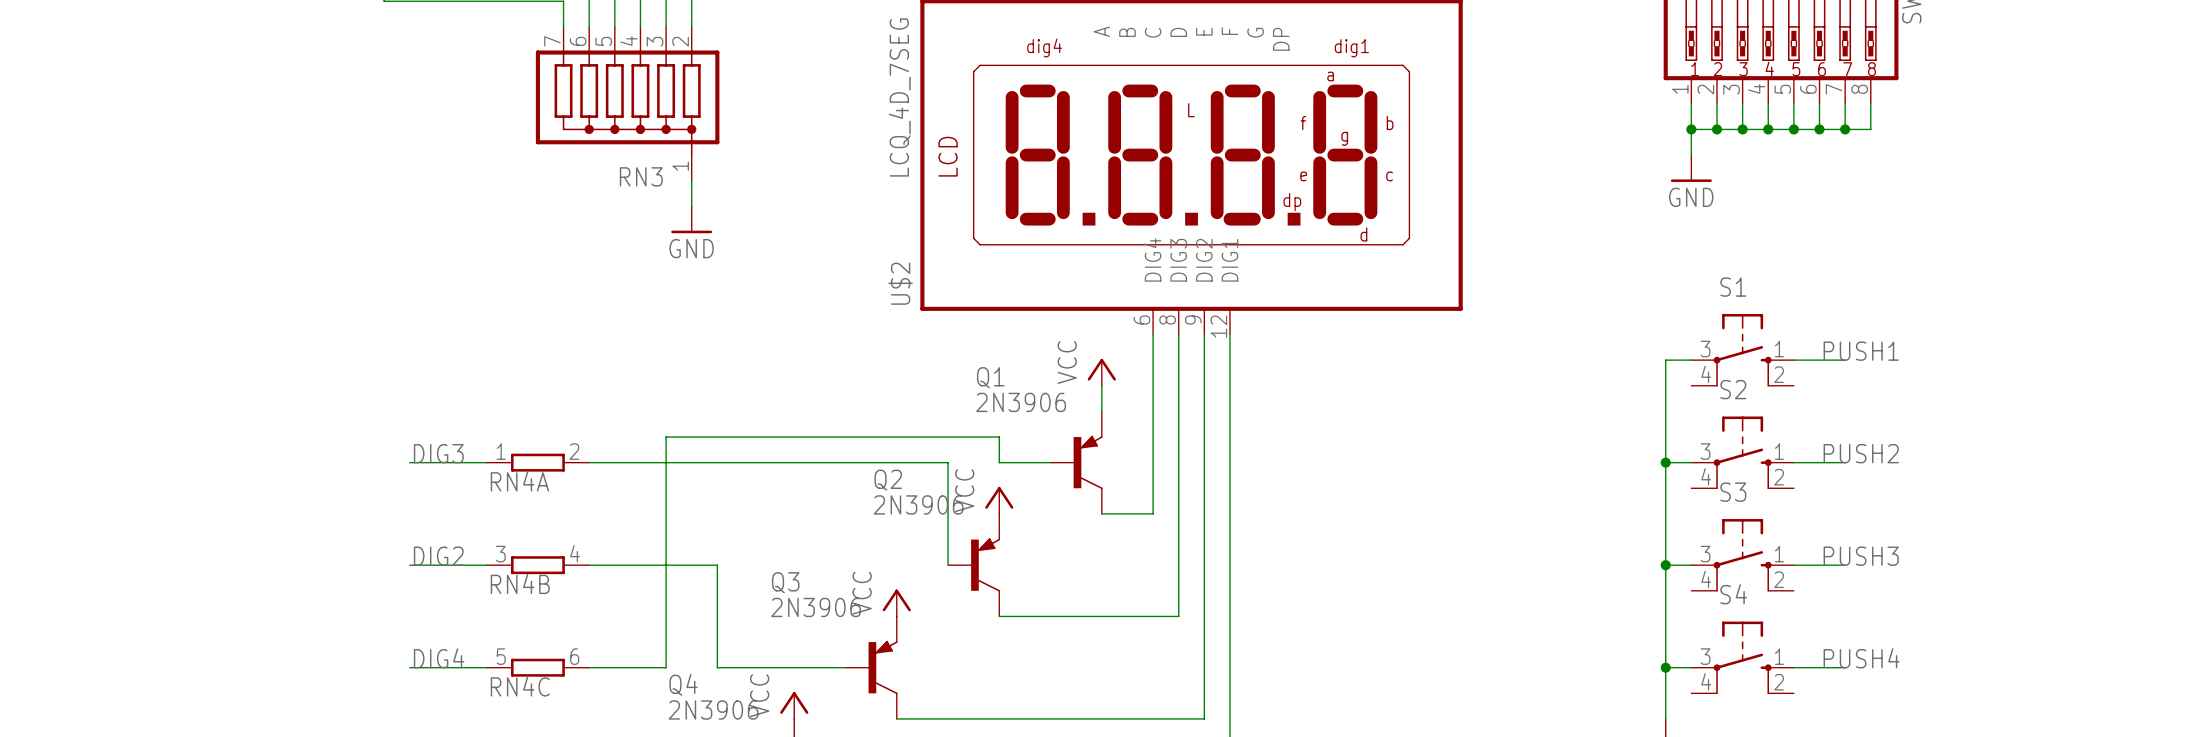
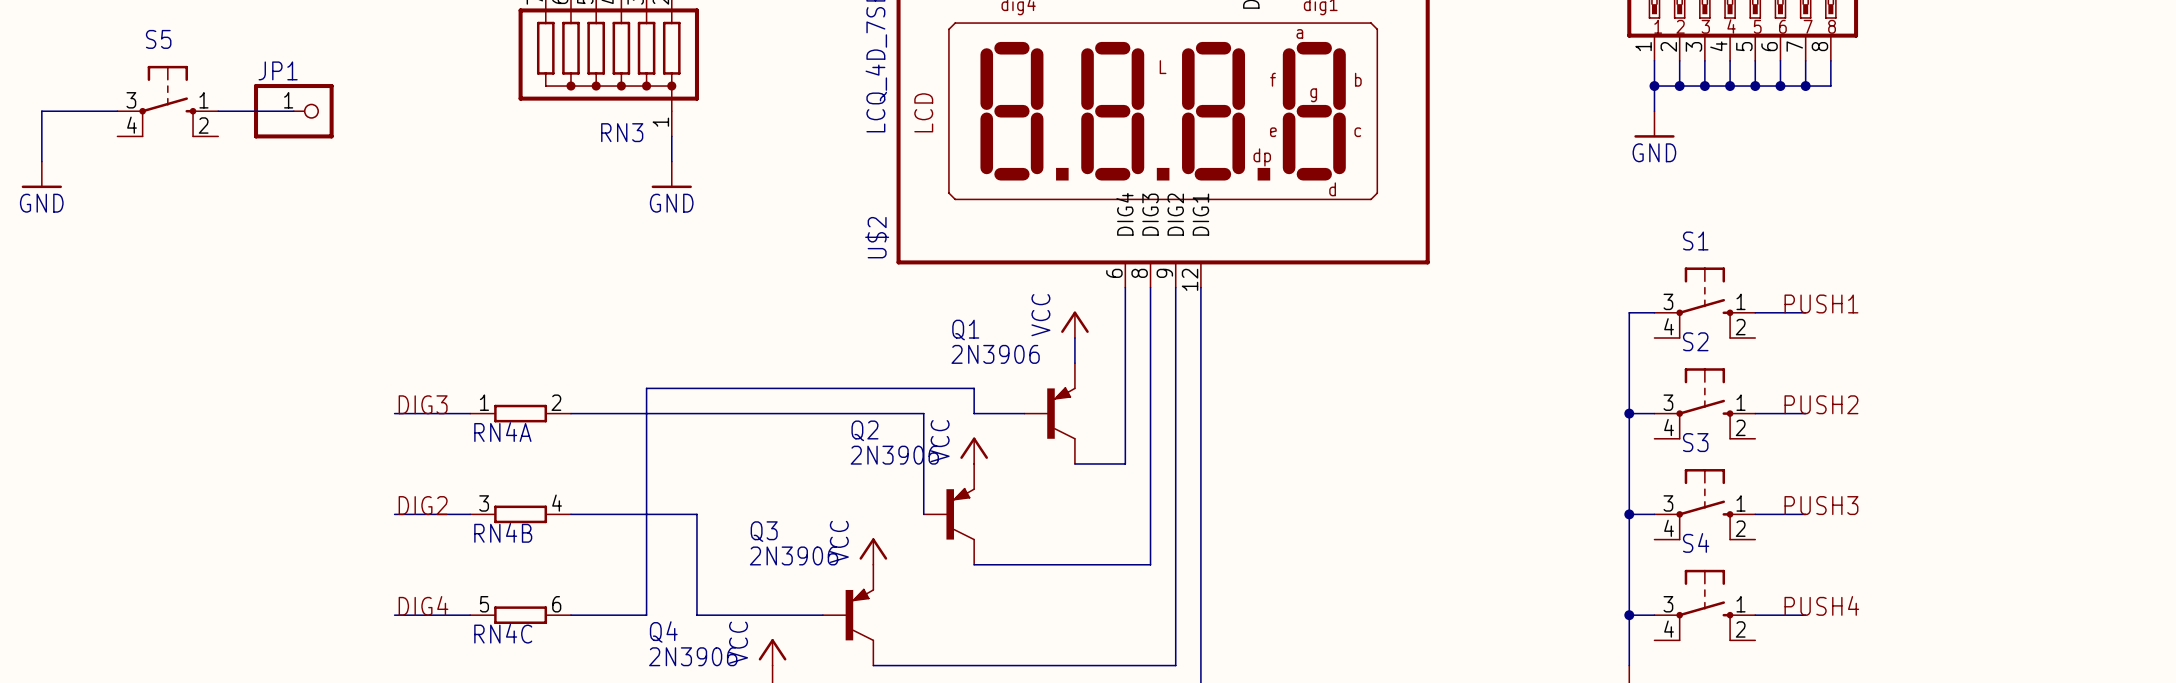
S5: none -> (167, 101)
wire: none -> (117, 111) (41, 111) (41, 161)
wire: none -> (218, 111) (293, 111)
JP1: none -> (293, 111)
power symbol: none -> GND (41, 174)

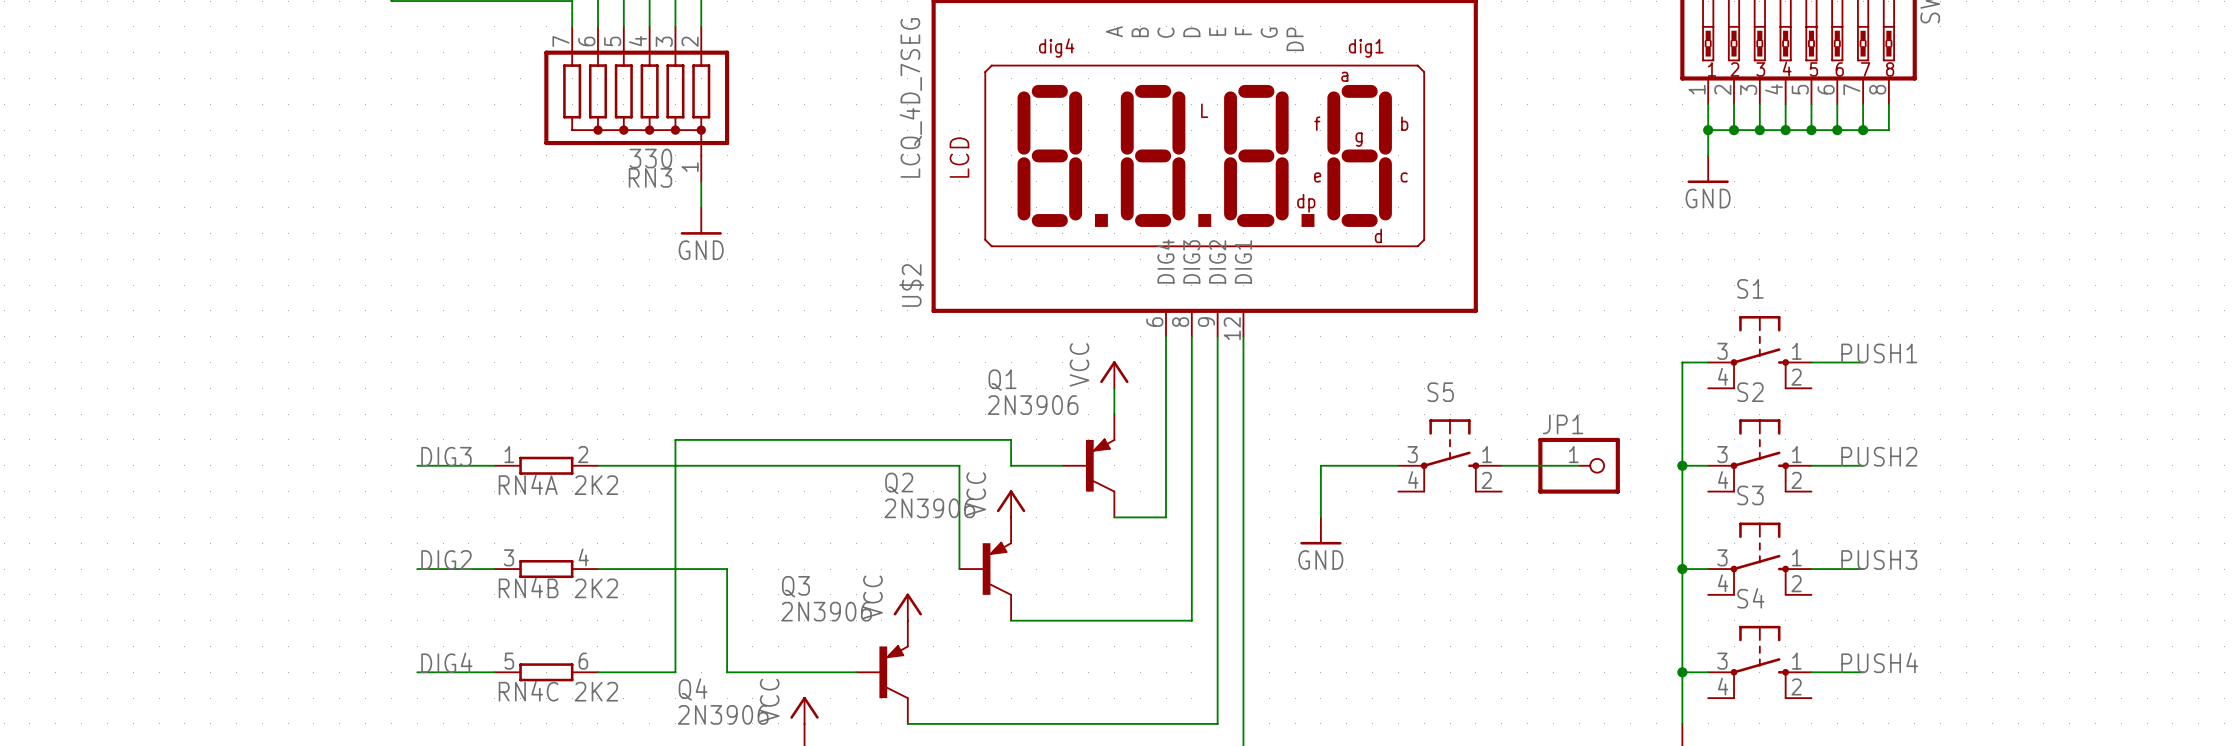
S5 position: (167, 101) -> (1450, 455)
wire: (117, 111) (41, 111) (41, 161) -> none
wire: (218, 111) (293, 111) -> none
JP1 position: (293, 111) -> (1579, 465)
RN3 value: none -> 330 (650, 158)
power symbol: GND (41, 174) -> none
wire: none -> (1398, 465) (1320, 465) (1320, 517)
wire: none -> (1501, 465) (1579, 465)
RN4A value: none -> 2K2 (596, 485)
power symbol: none -> GND (1320, 530)
RN4B value: none -> 2K2 (596, 588)
RN4C value: none -> 2K2 (596, 691)

